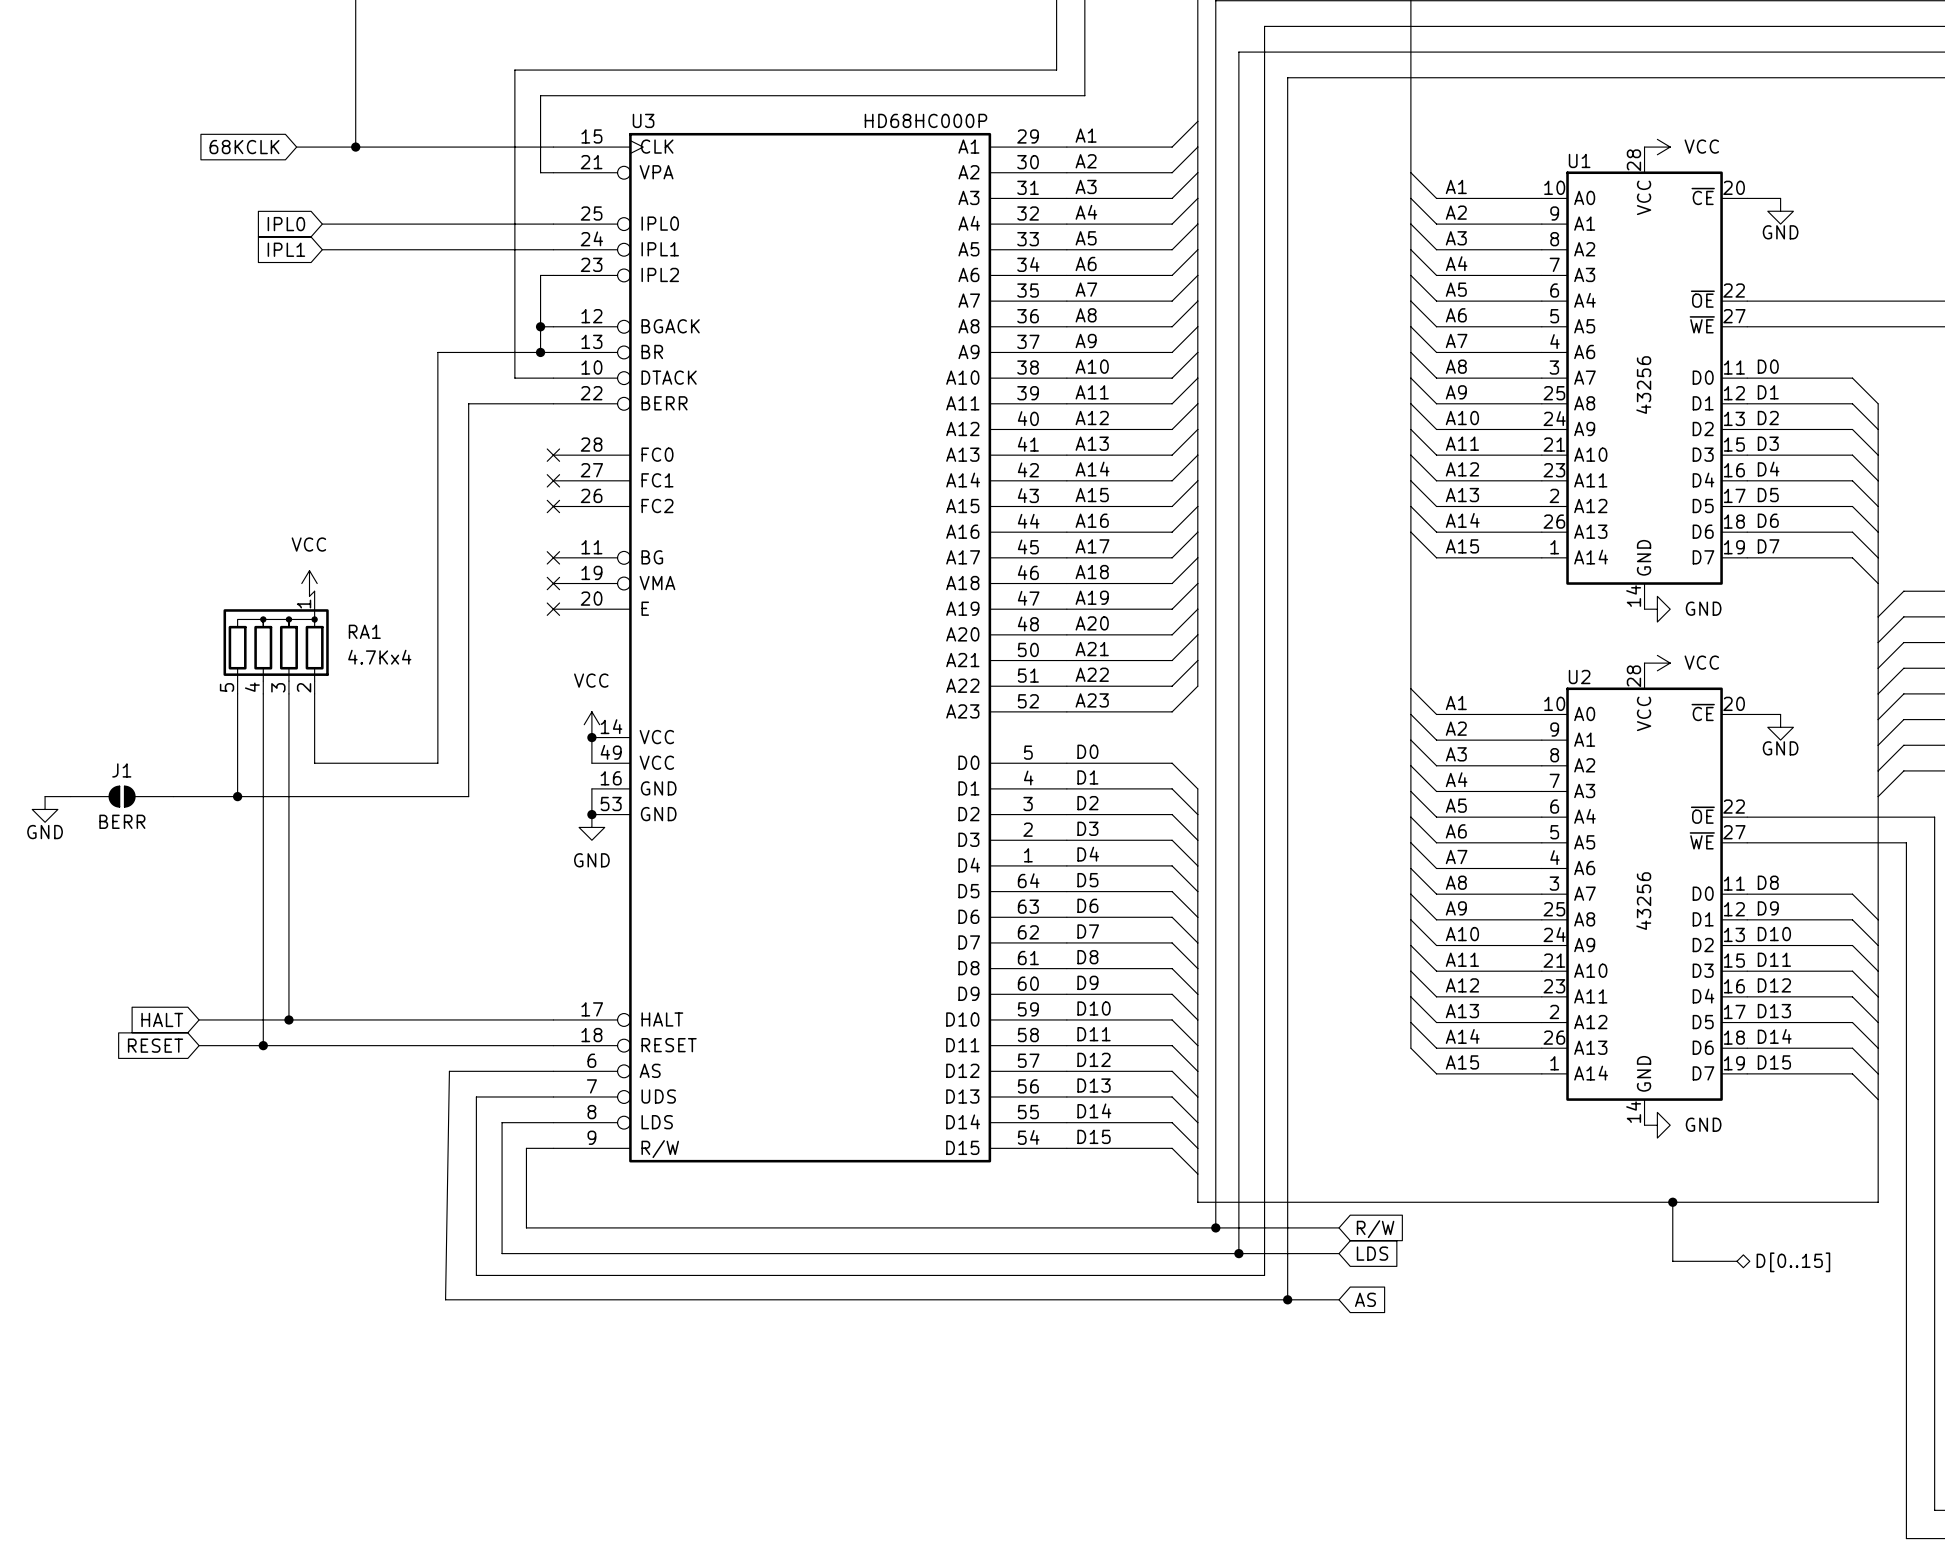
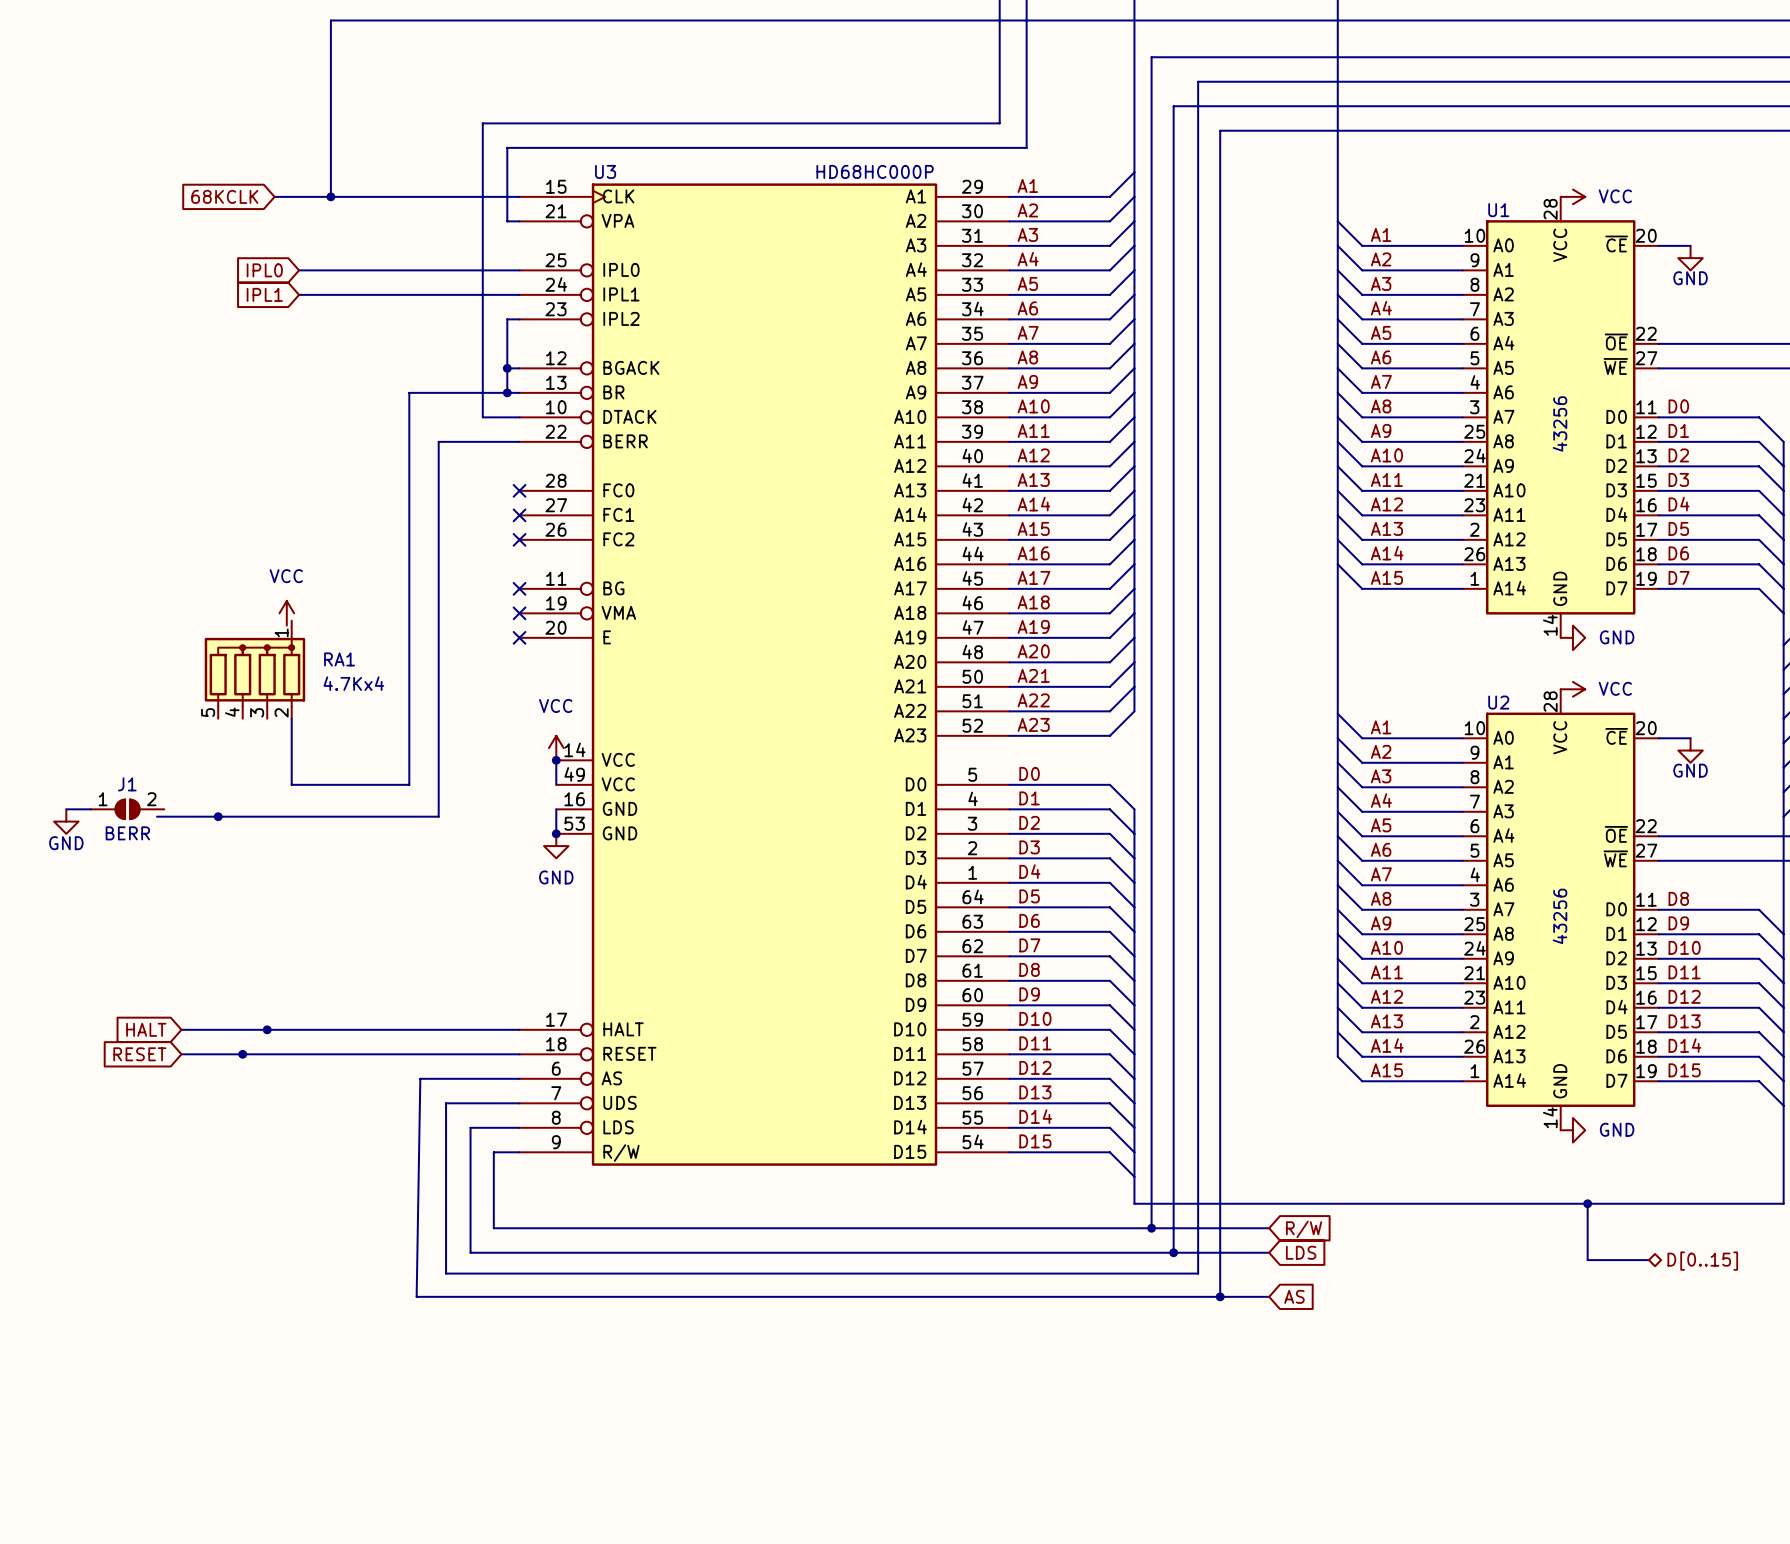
wire: (314, 591) (309, 596) -> none
wire: (237, 693) (237, 796) -> none
wire: (263, 693) (263, 1045) -> none
wire: (288, 693) (288, 1019) -> none
J1 symbol: [70, 785, 174, 808] -> [90, 799, 165, 820]
wire: (45, 796) (70, 796) -> (66, 809) (90, 809)
power symbol position: GND (45, 809) -> GND (66, 821)

